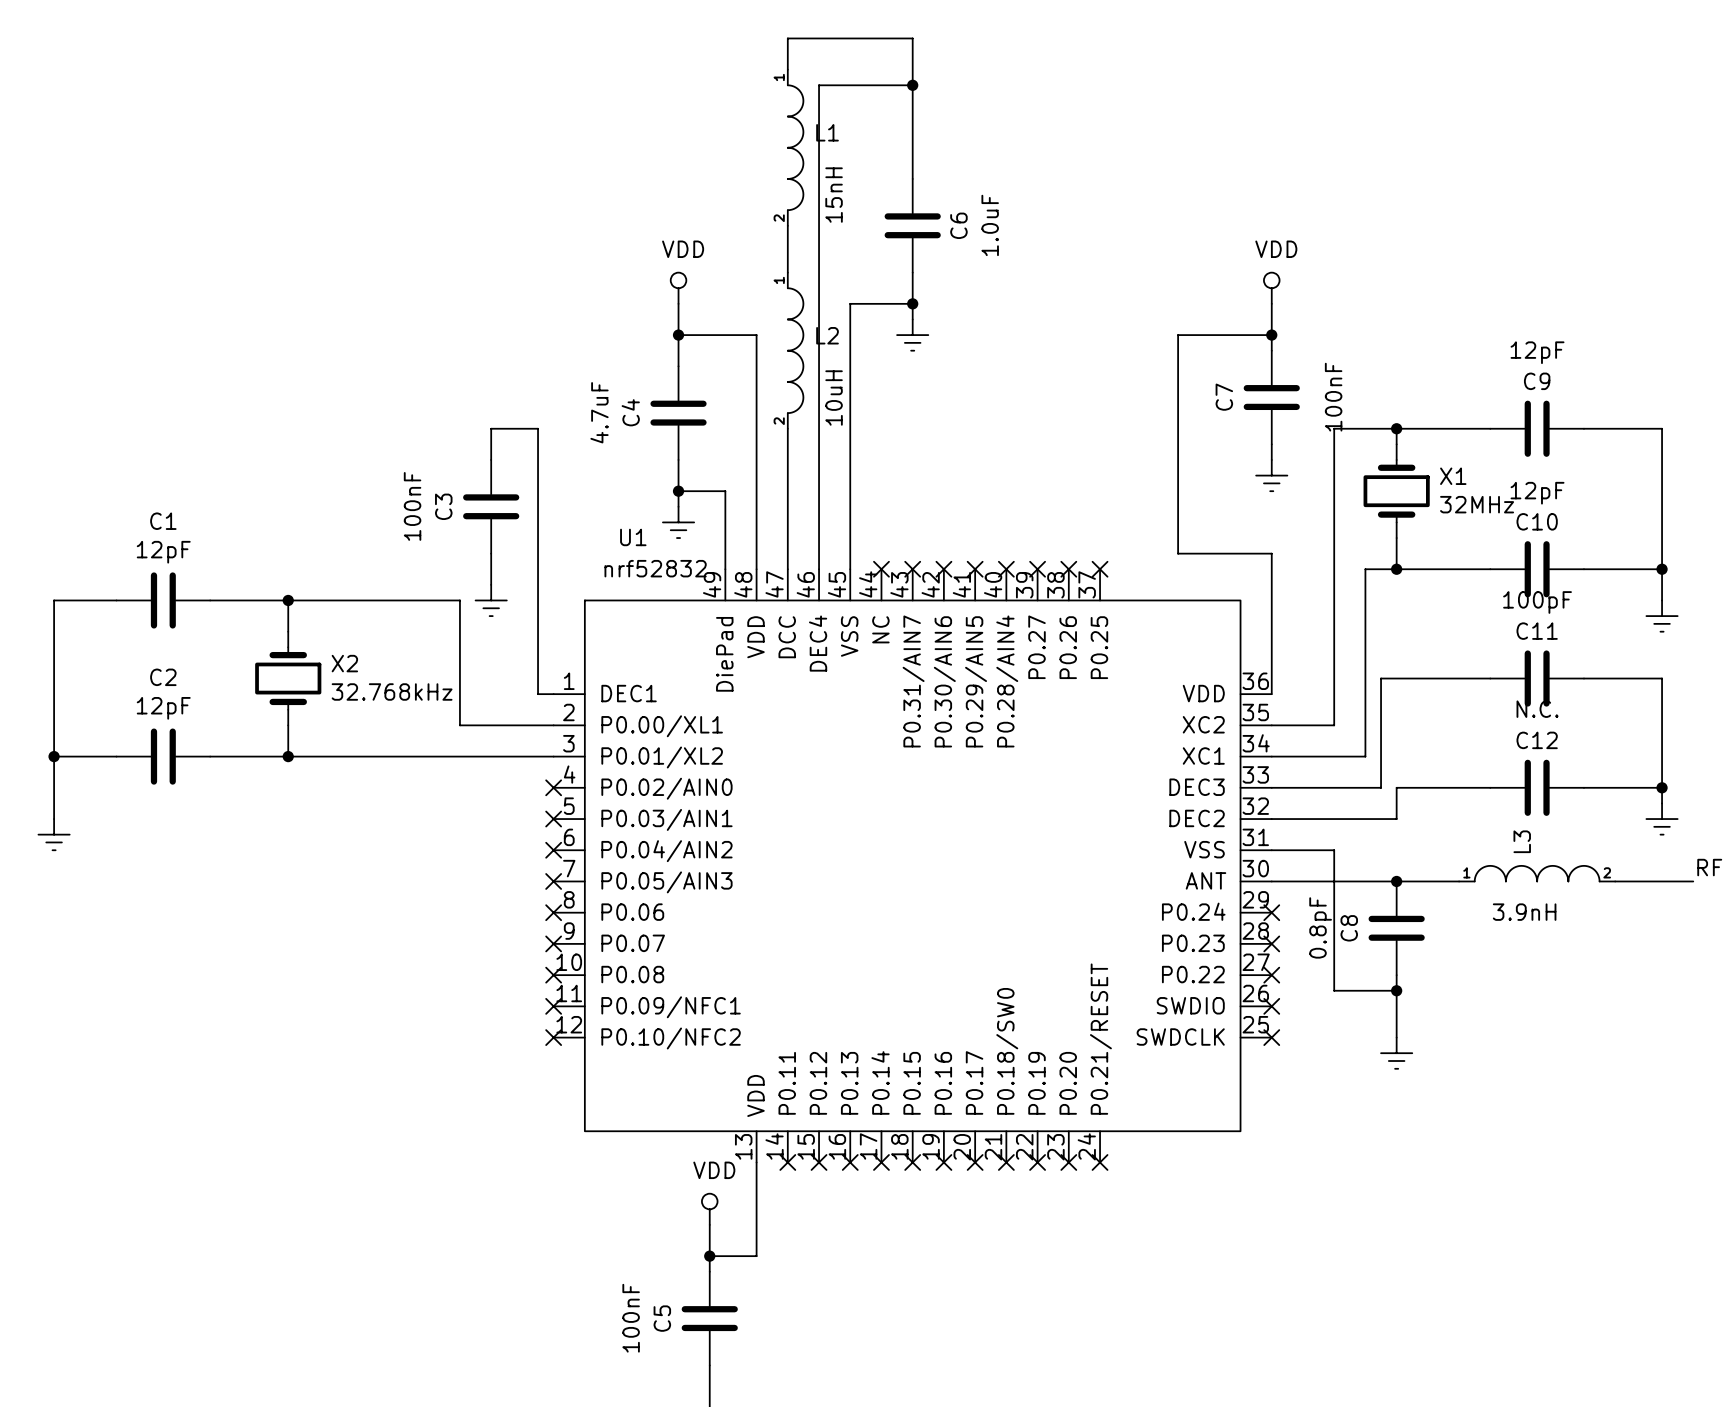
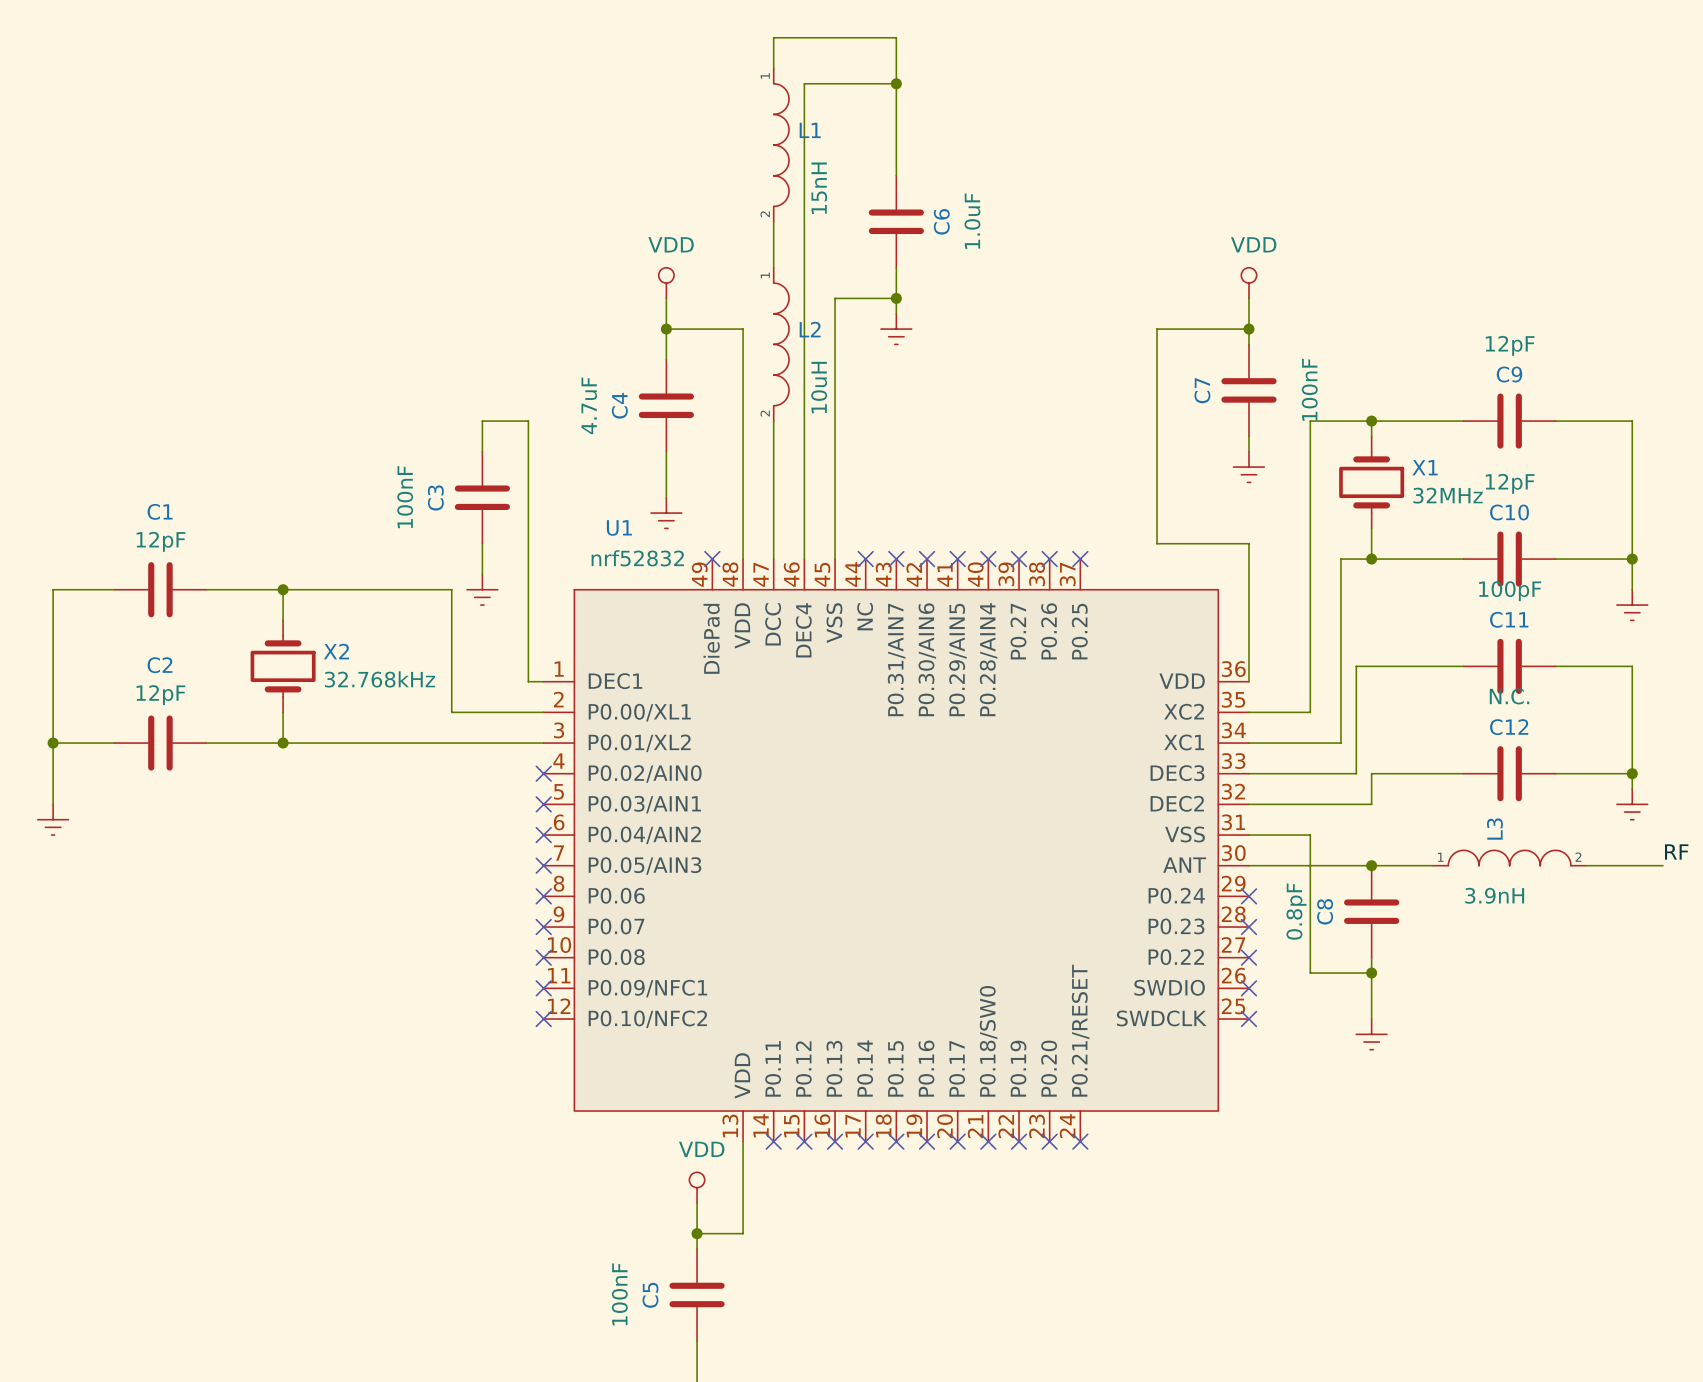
wire: (678, 491) (725, 491) (725, 569) -> none
junction: (678, 491) -> none
no-connect mark: none -> (712, 559)

